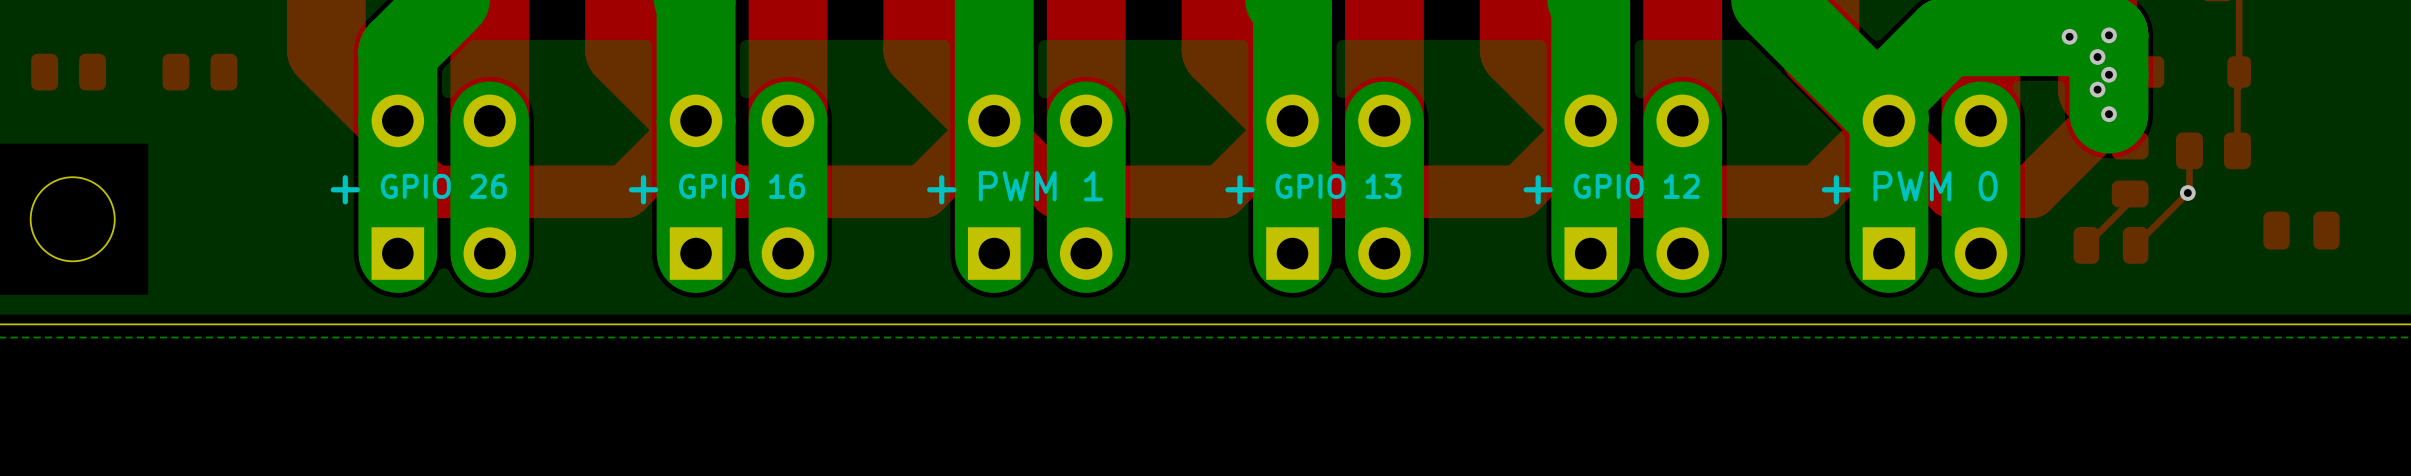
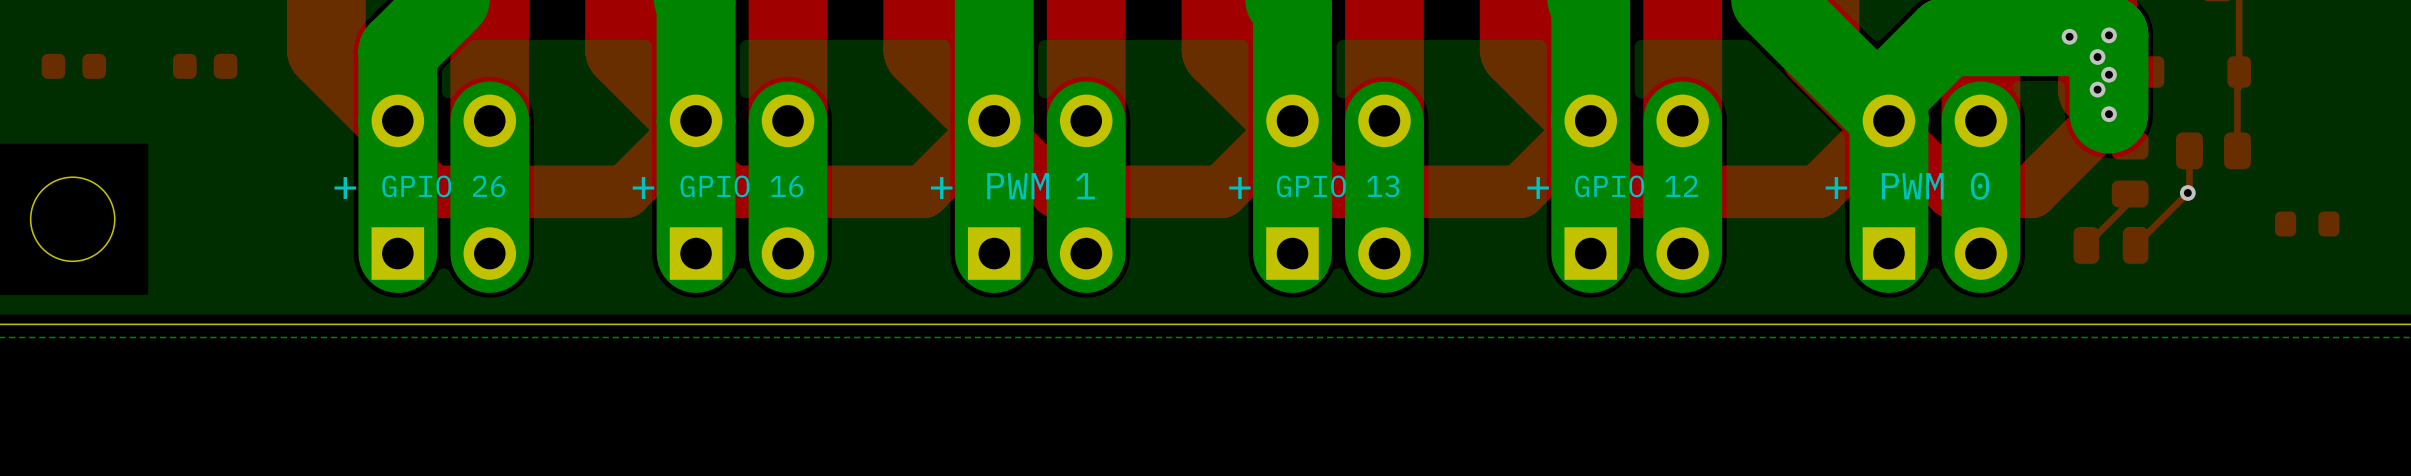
part footprint: [31, 53, 107, 91] -> [41, 53, 107, 79]
part footprint: [162, 53, 238, 91] -> [173, 53, 238, 79]
part footprint: [2263, 211, 2340, 250] -> [2275, 211, 2340, 237]

